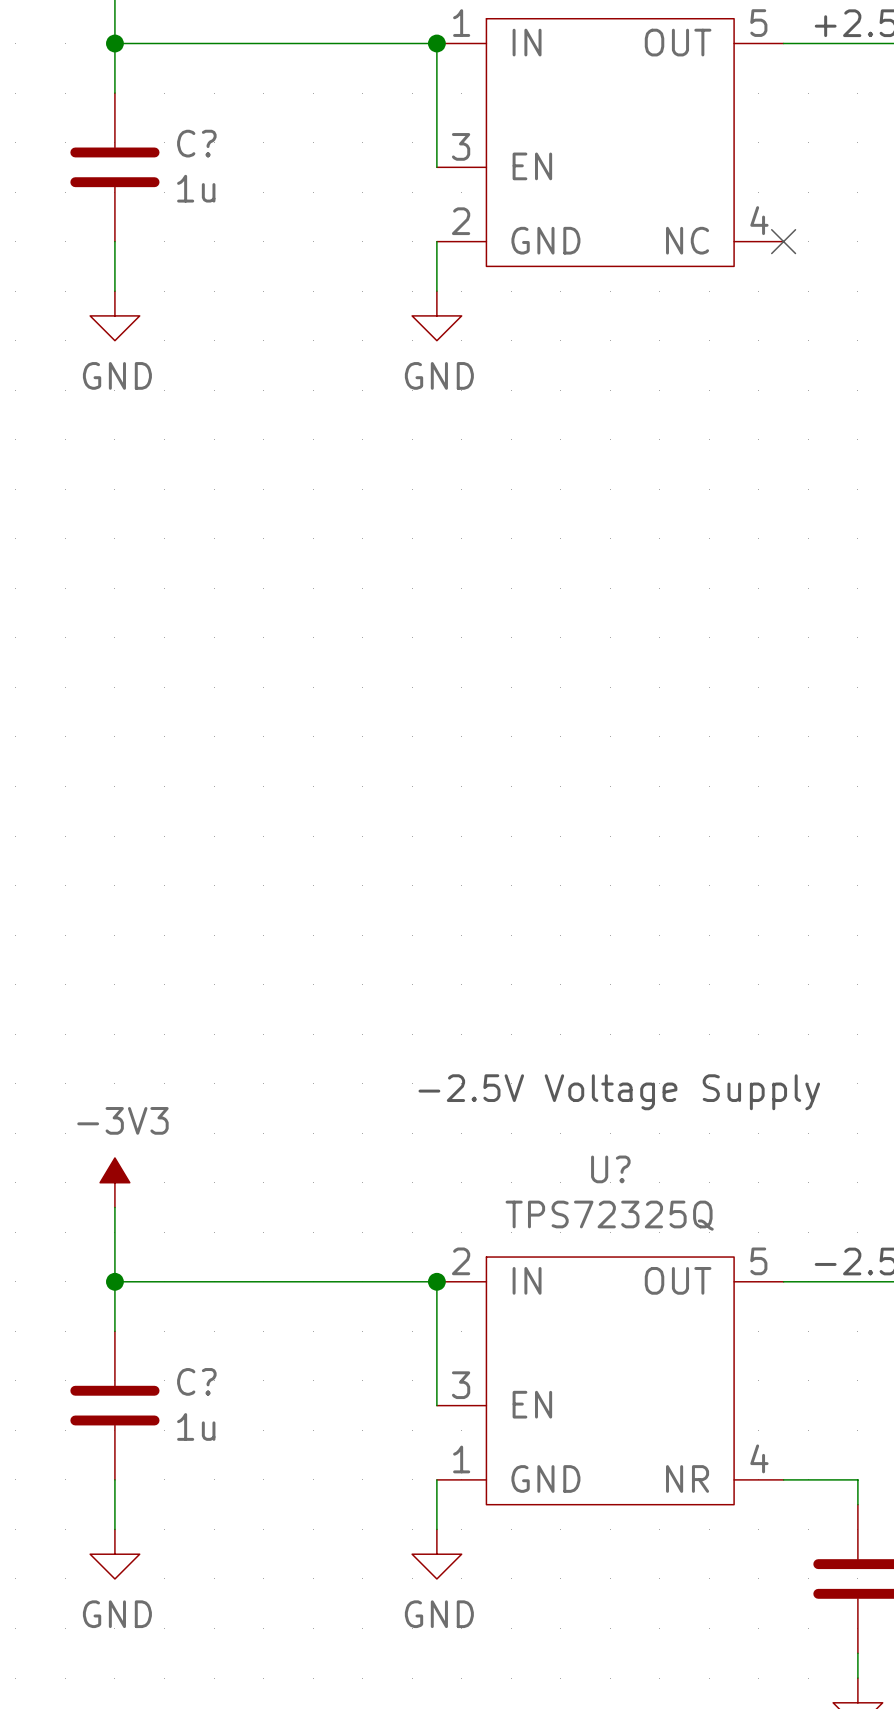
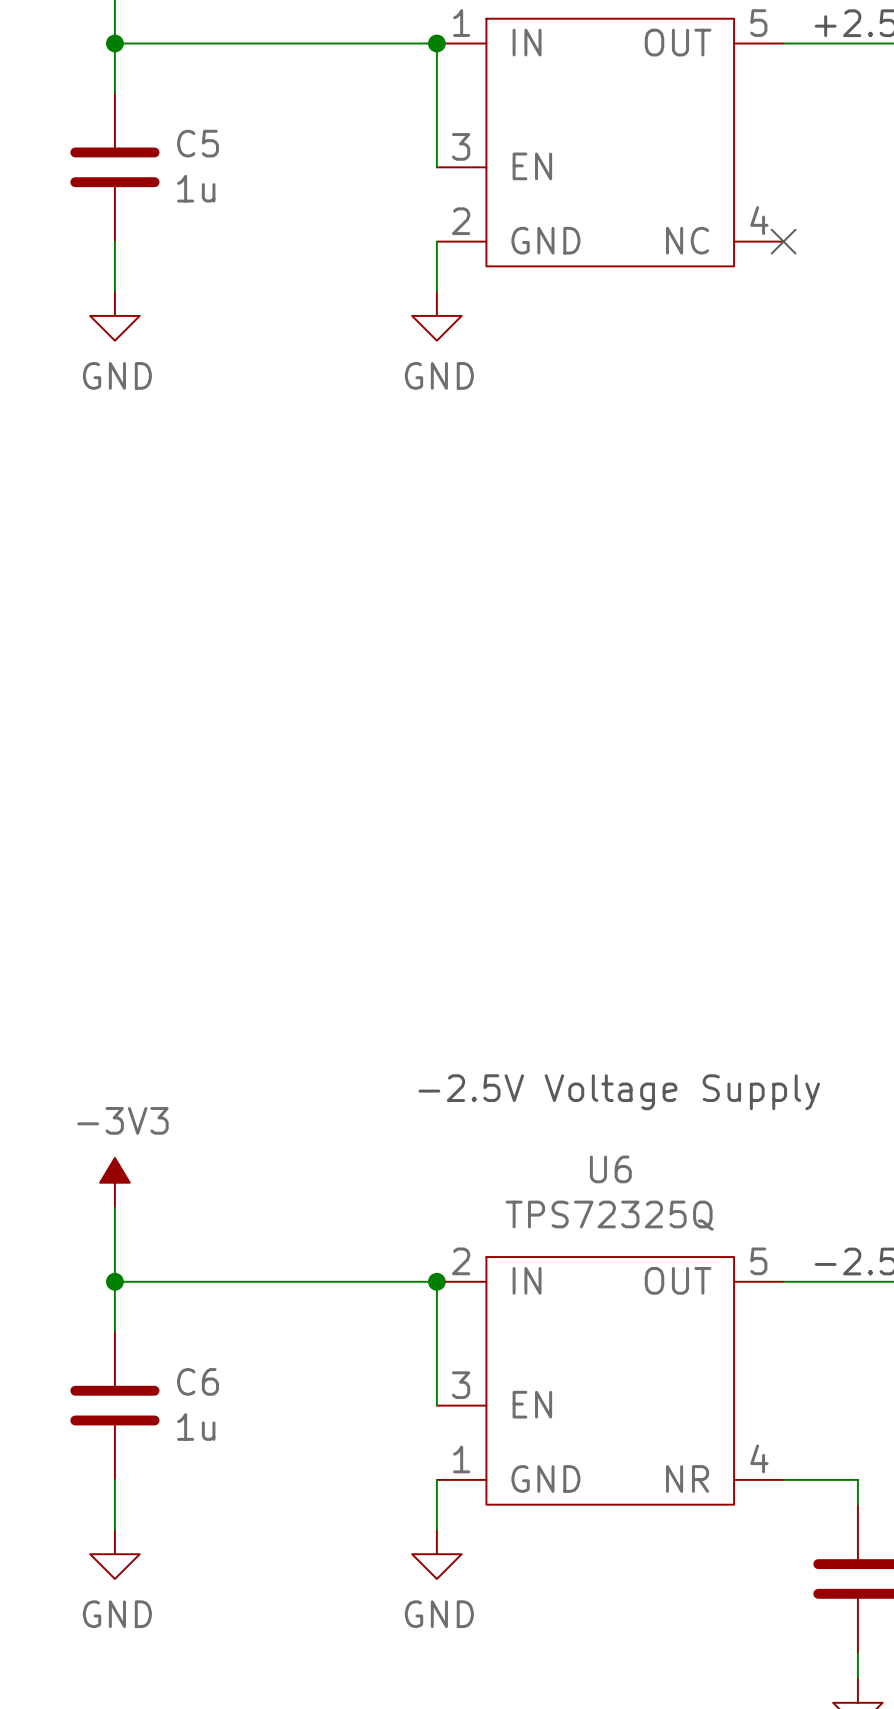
C? name: C? (196, 143) -> C5 (198, 143)
U? name: U? (610, 1169) -> U6 (610, 1169)
C? name: C? (196, 1381) -> C6 (198, 1381)

